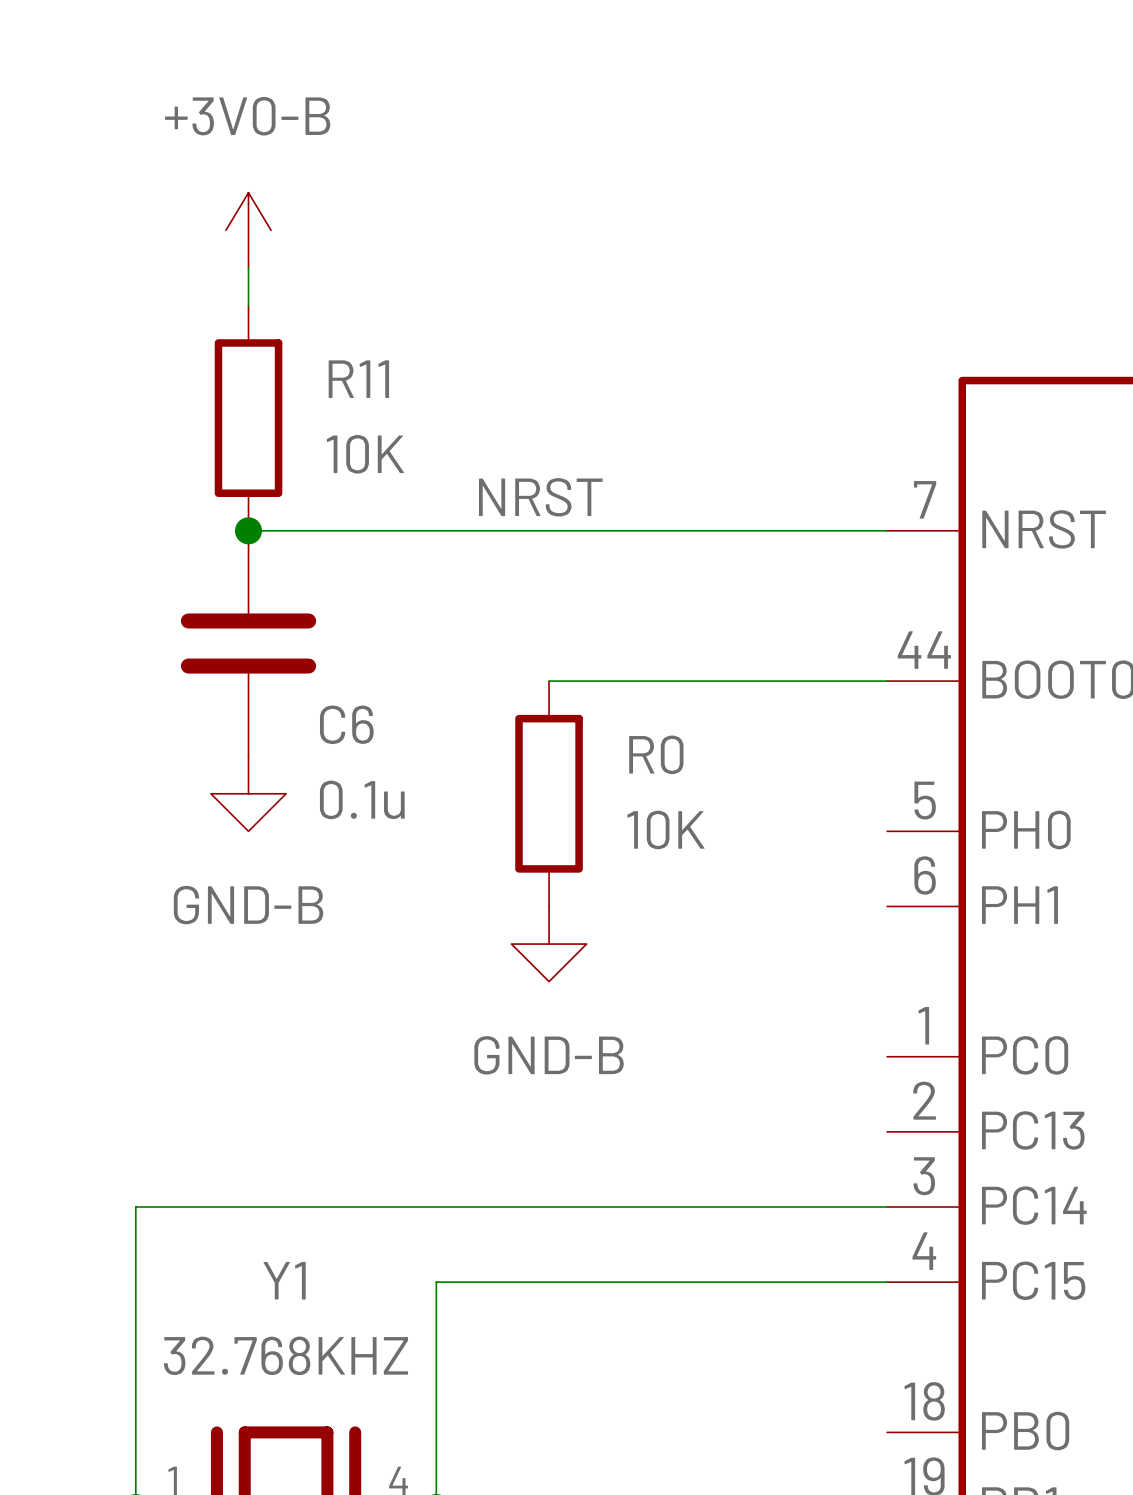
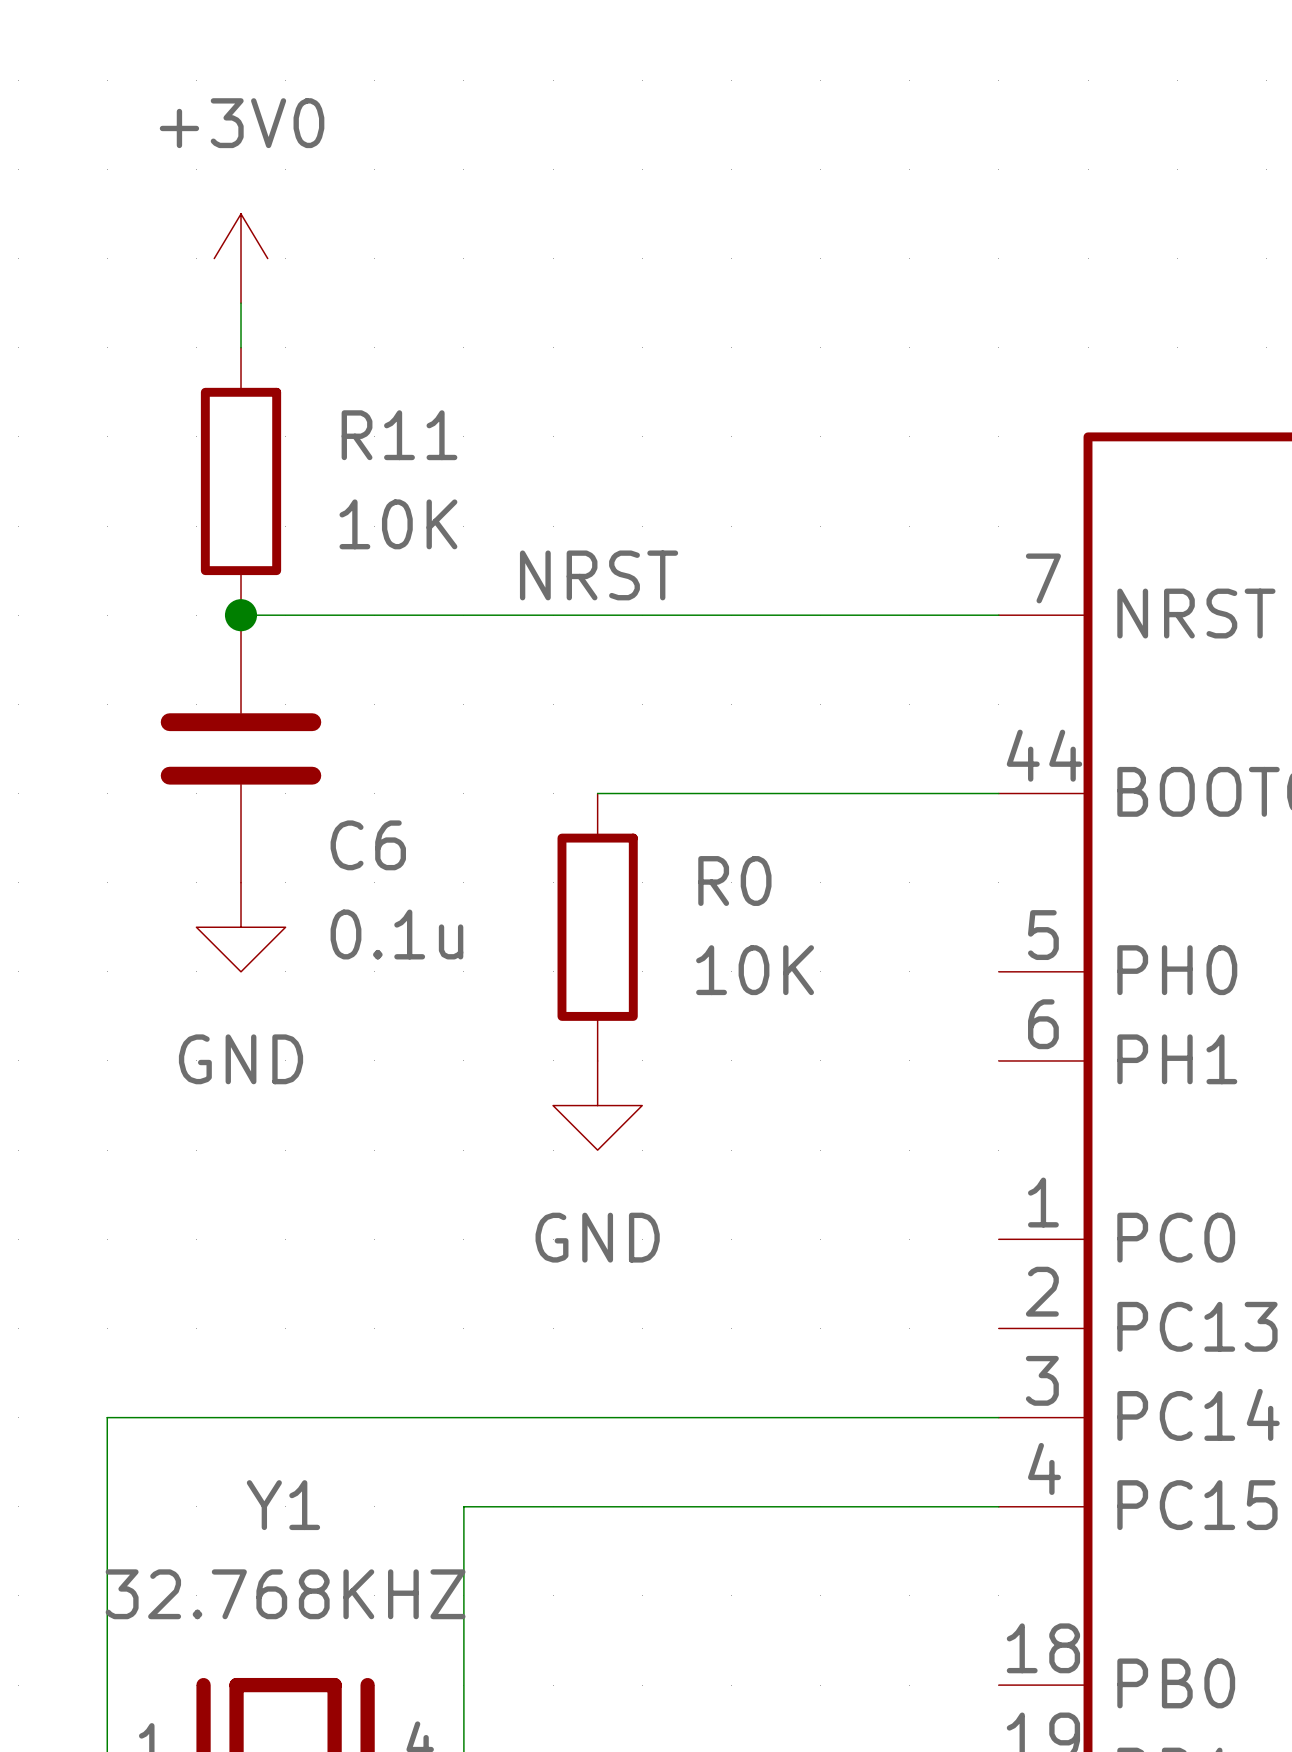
power symbol: +3V0-B (248, 230) -> +3V0 (241, 258)
power symbol: GND-B (248, 793) -> GND (241, 927)
power symbol: GND-B (549, 944) -> GND (597, 1105)

